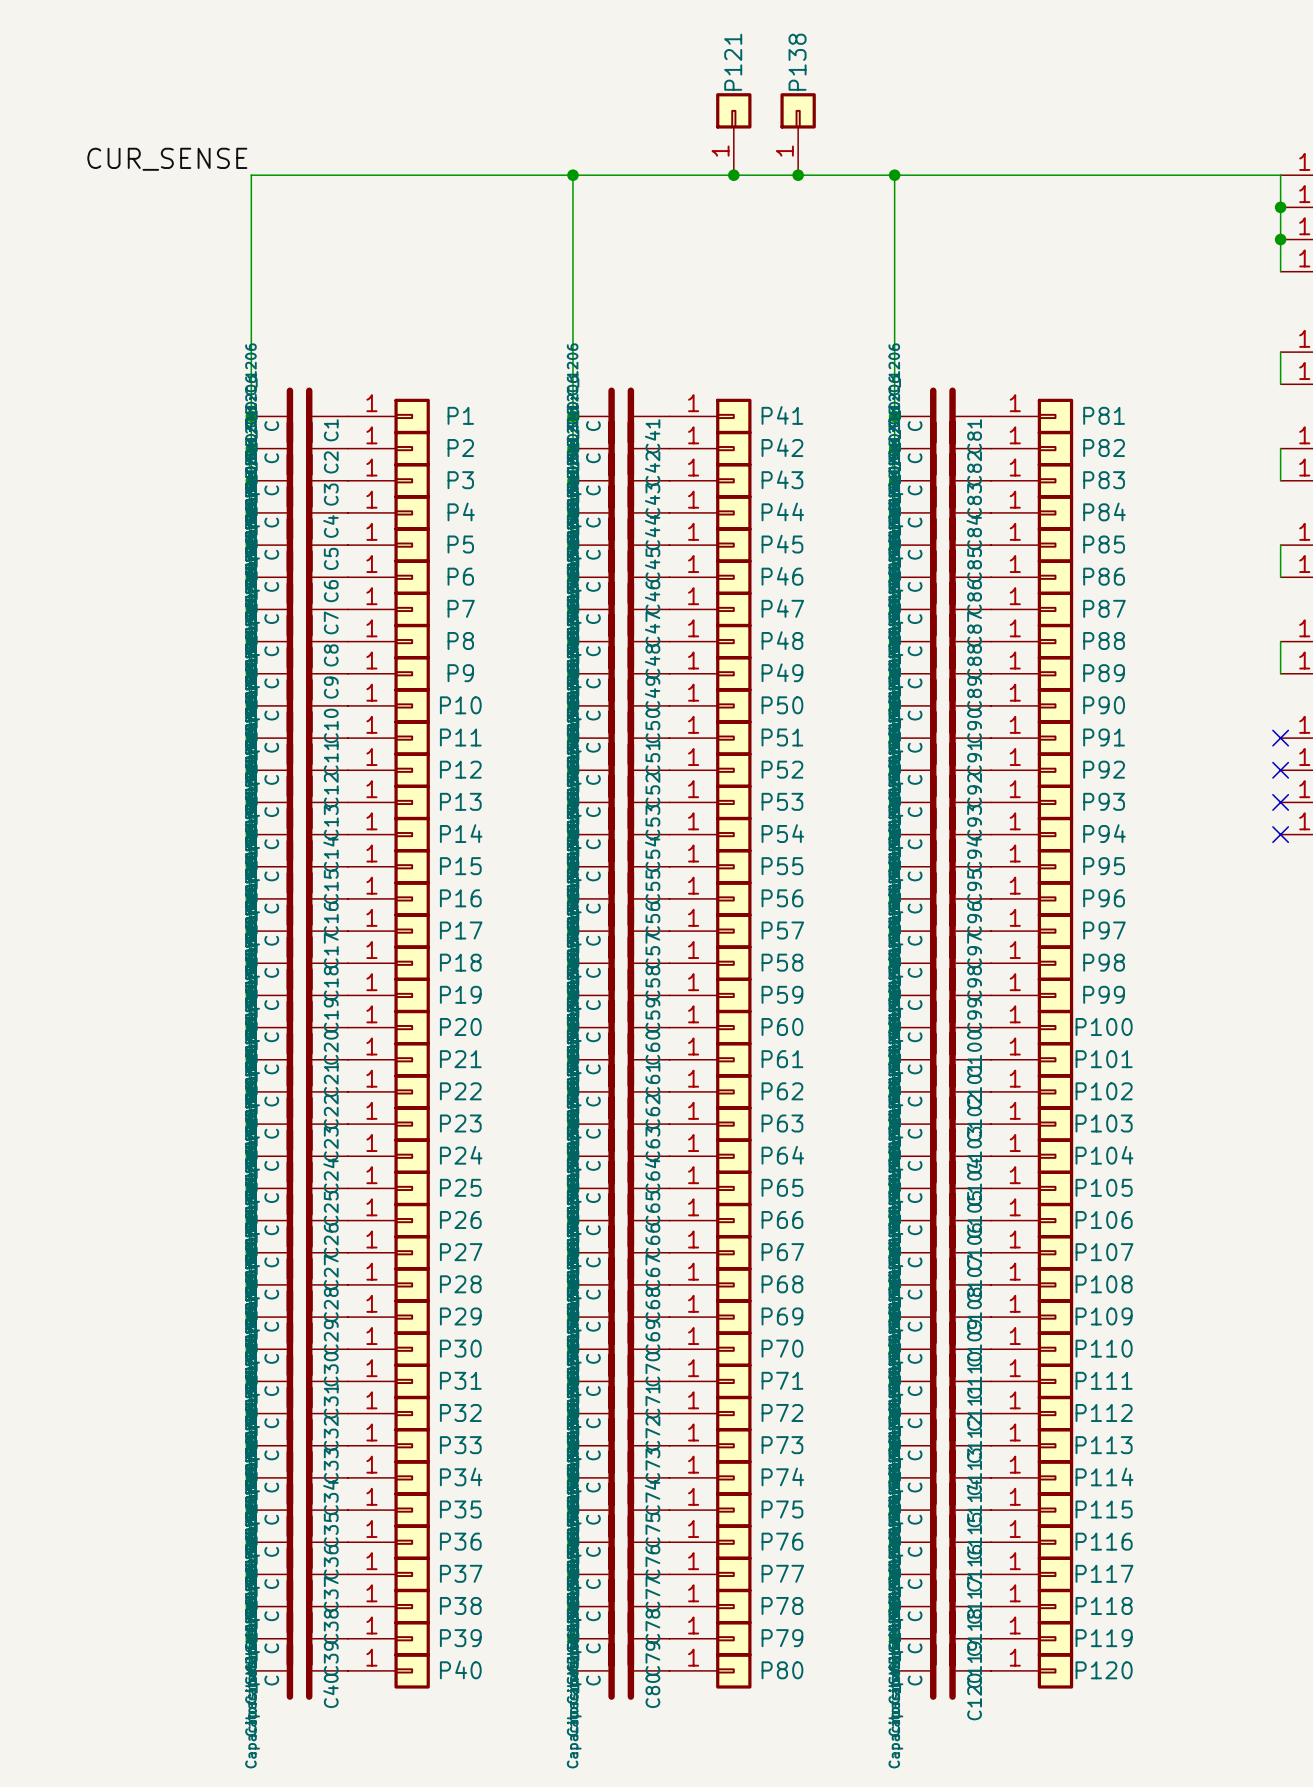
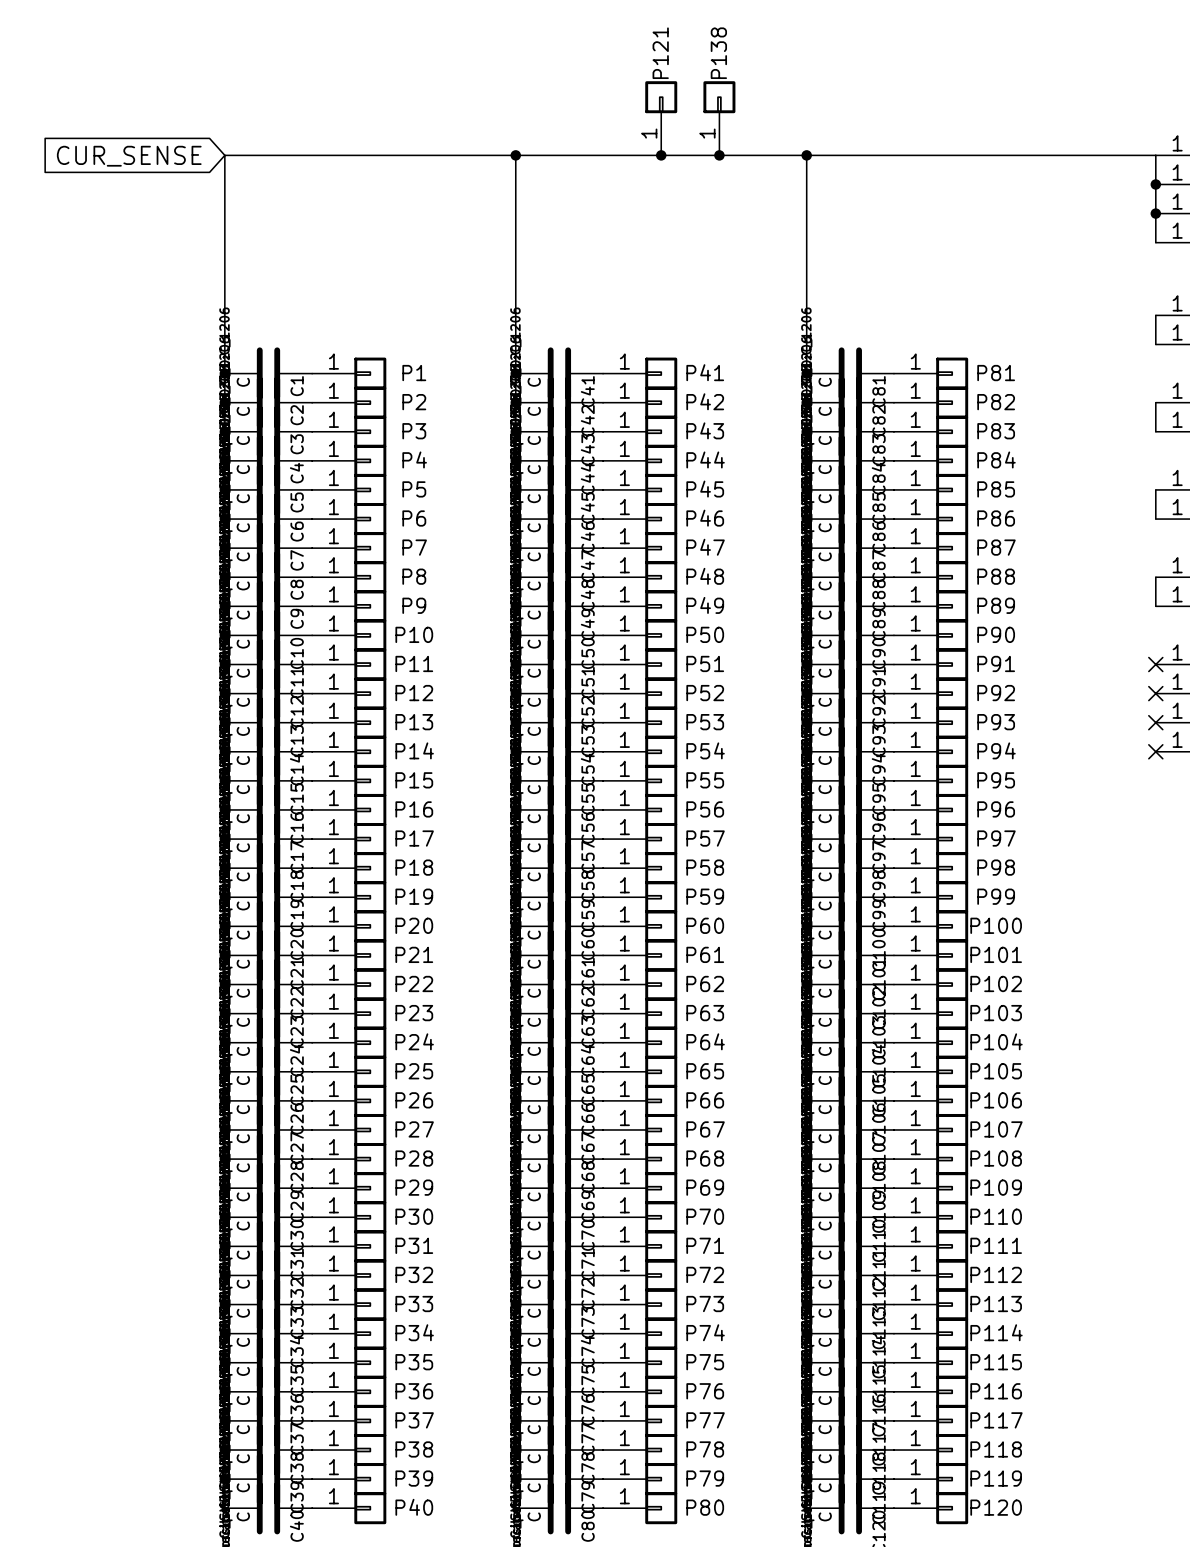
label: CUR_SENSE (167, 159) -> none
global label: none -> CUR_SENSE (129, 156)

